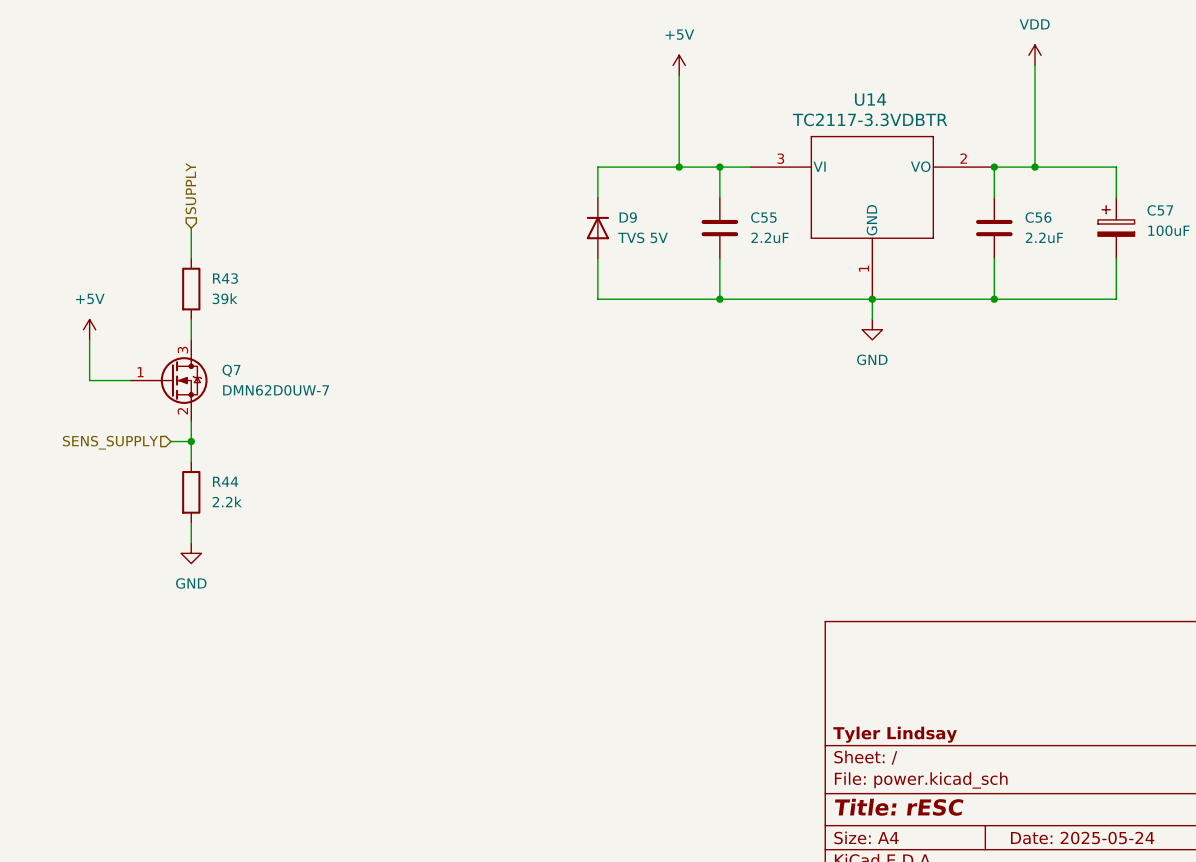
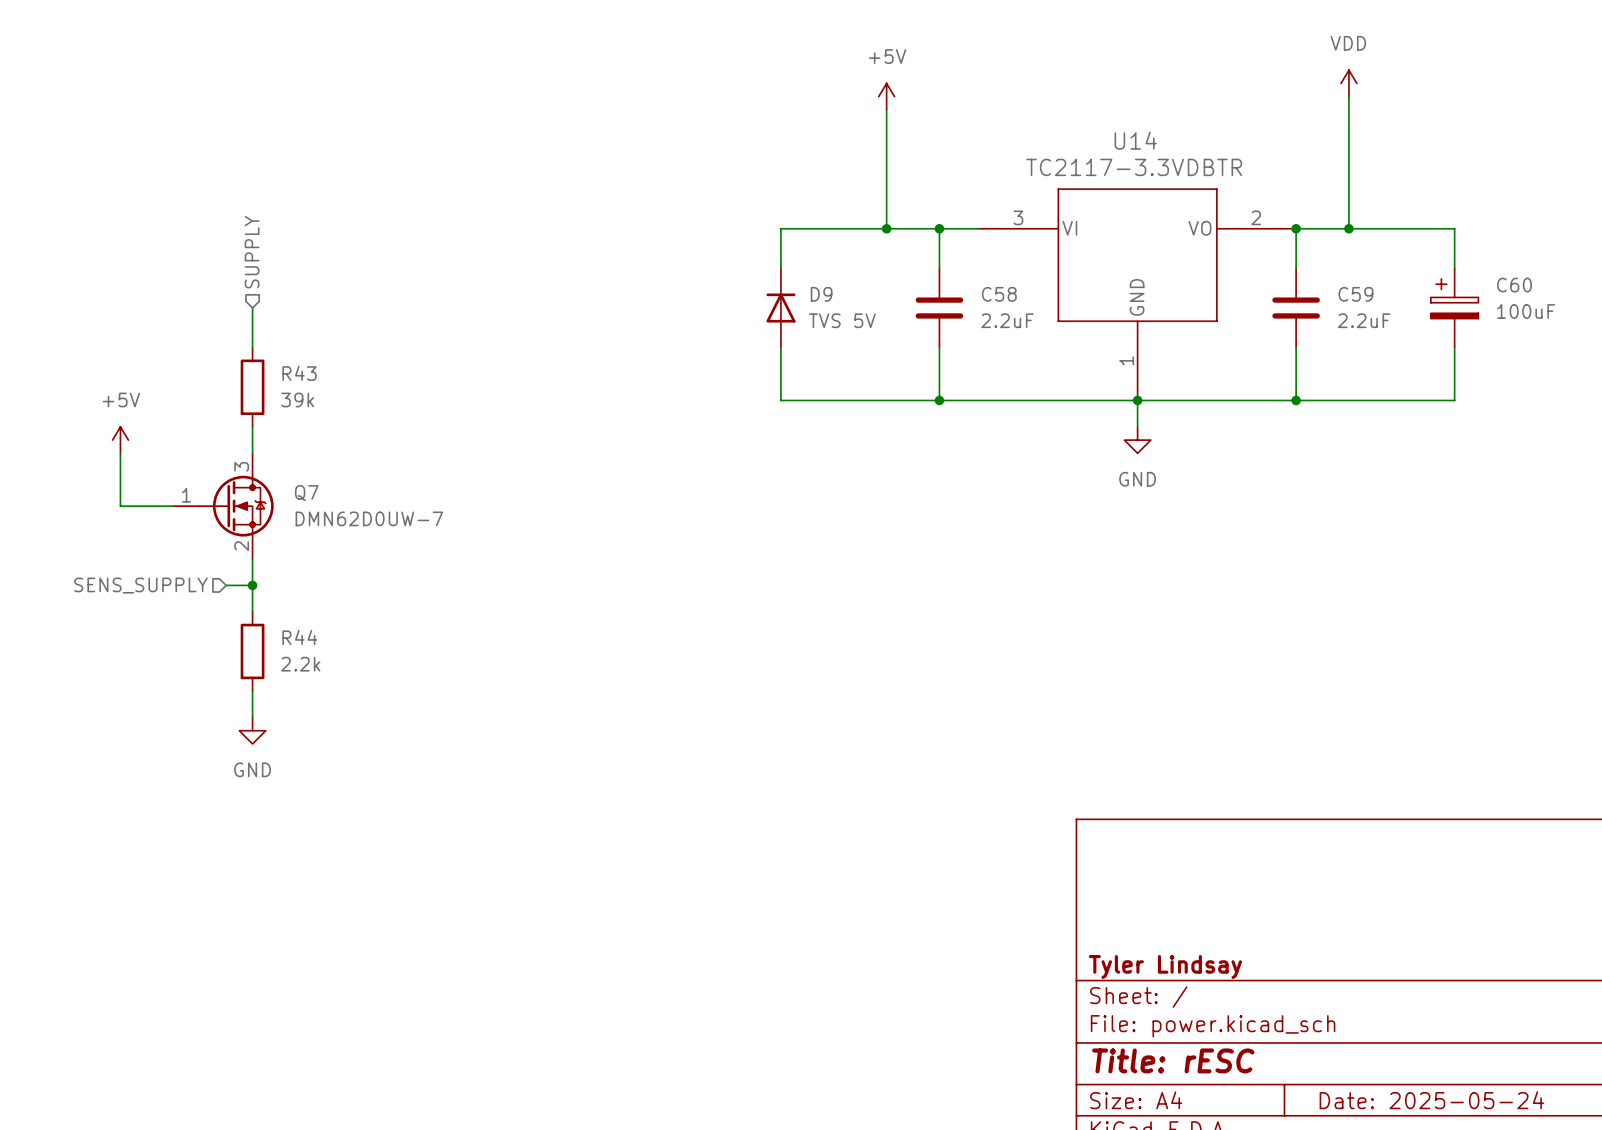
C57 name: C57 (1160, 210) -> C60 (1514, 285)
C55 name: C55 (763, 217) -> C58 (999, 294)
C56 name: C56 (1038, 217) -> C59 (1355, 294)

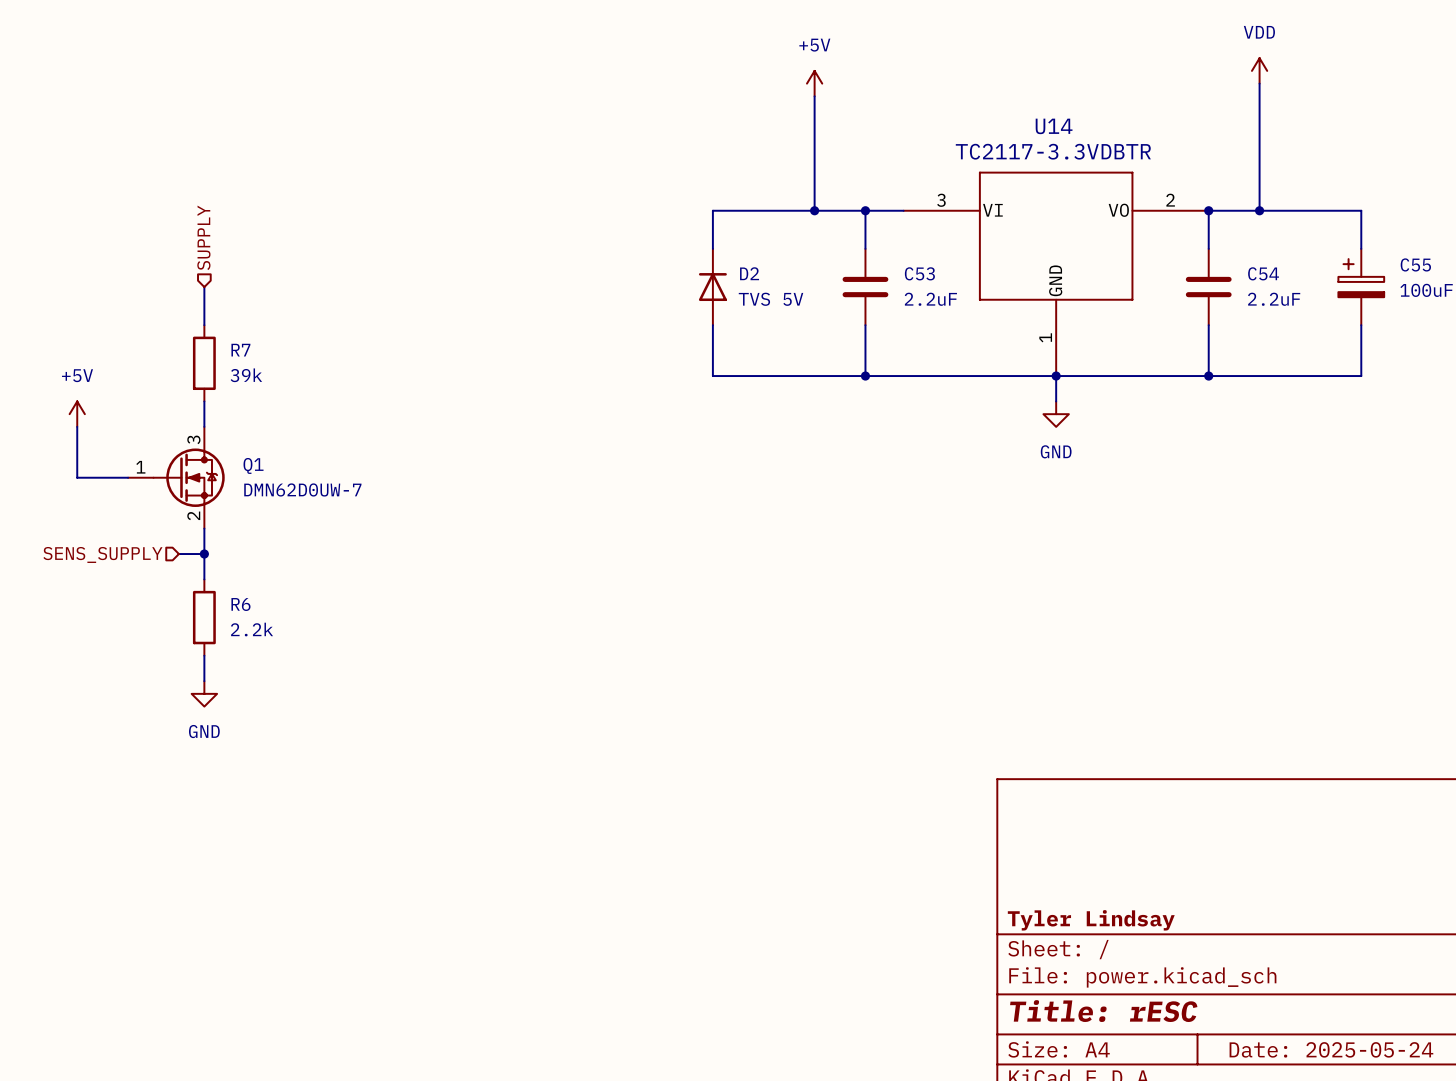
C60 name: C60 (1514, 285) -> C55 (1415, 264)
D9 name: D9 (821, 294) -> D2 (749, 273)
C58 name: C58 (999, 294) -> C53 (919, 273)
C59 name: C59 (1355, 294) -> C54 (1263, 273)
R43 name: R43 (299, 373) -> R7 (240, 350)
Q7 name: Q7 (306, 493) -> Q1 (253, 465)
R44 name: R44 (299, 637) -> R6 (240, 604)

